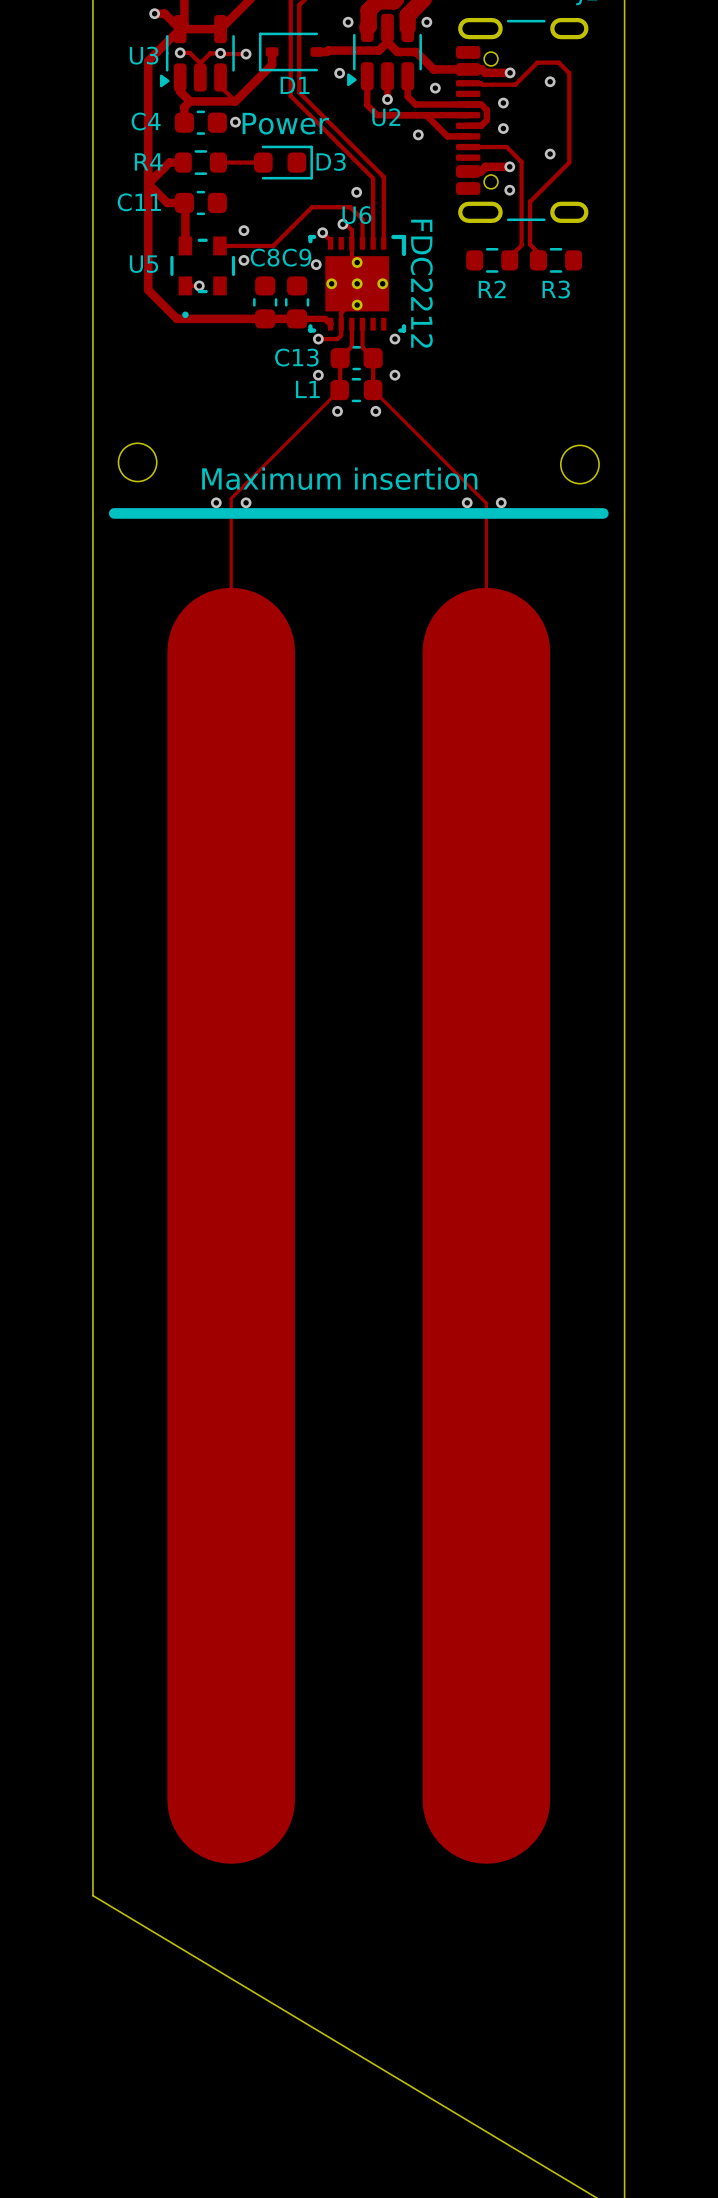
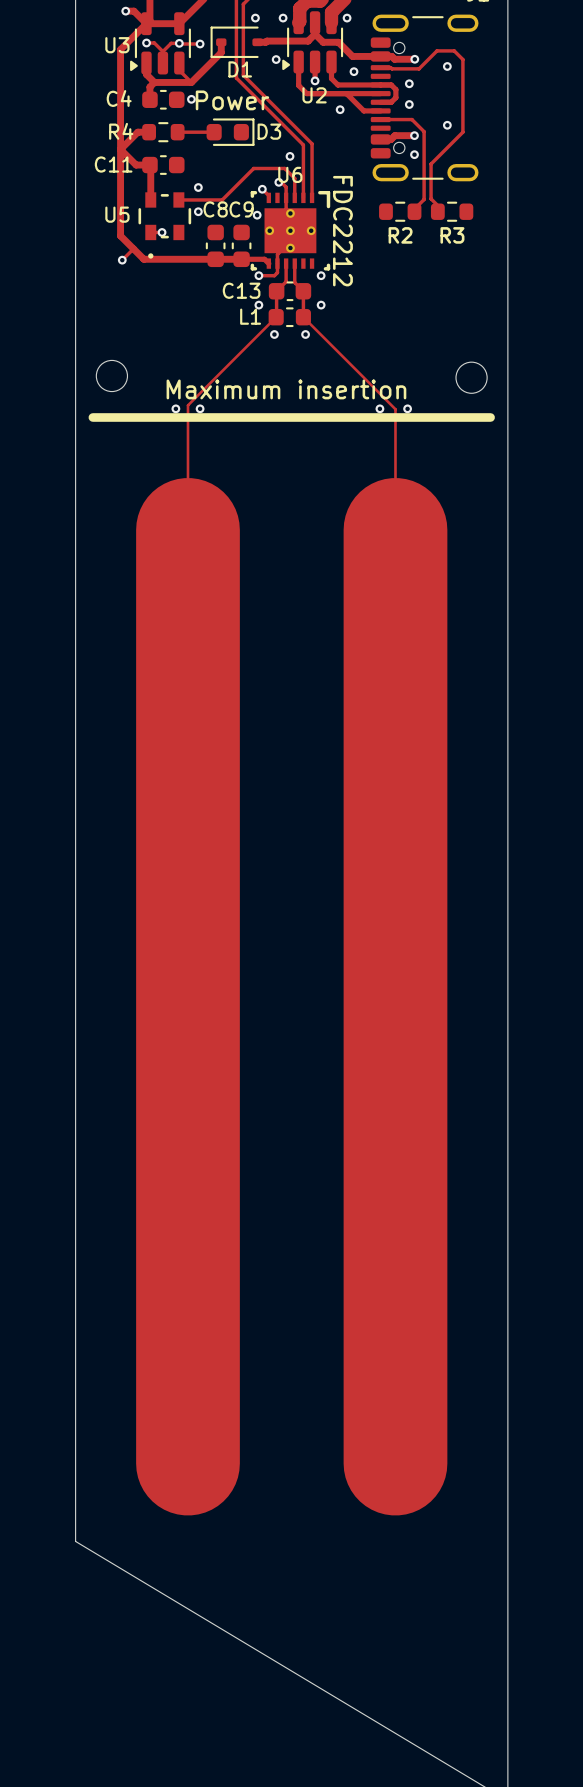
via: none -> (255, 18)
track: none -> (133, 248) (122, 260)
via: none -> (122, 260)

